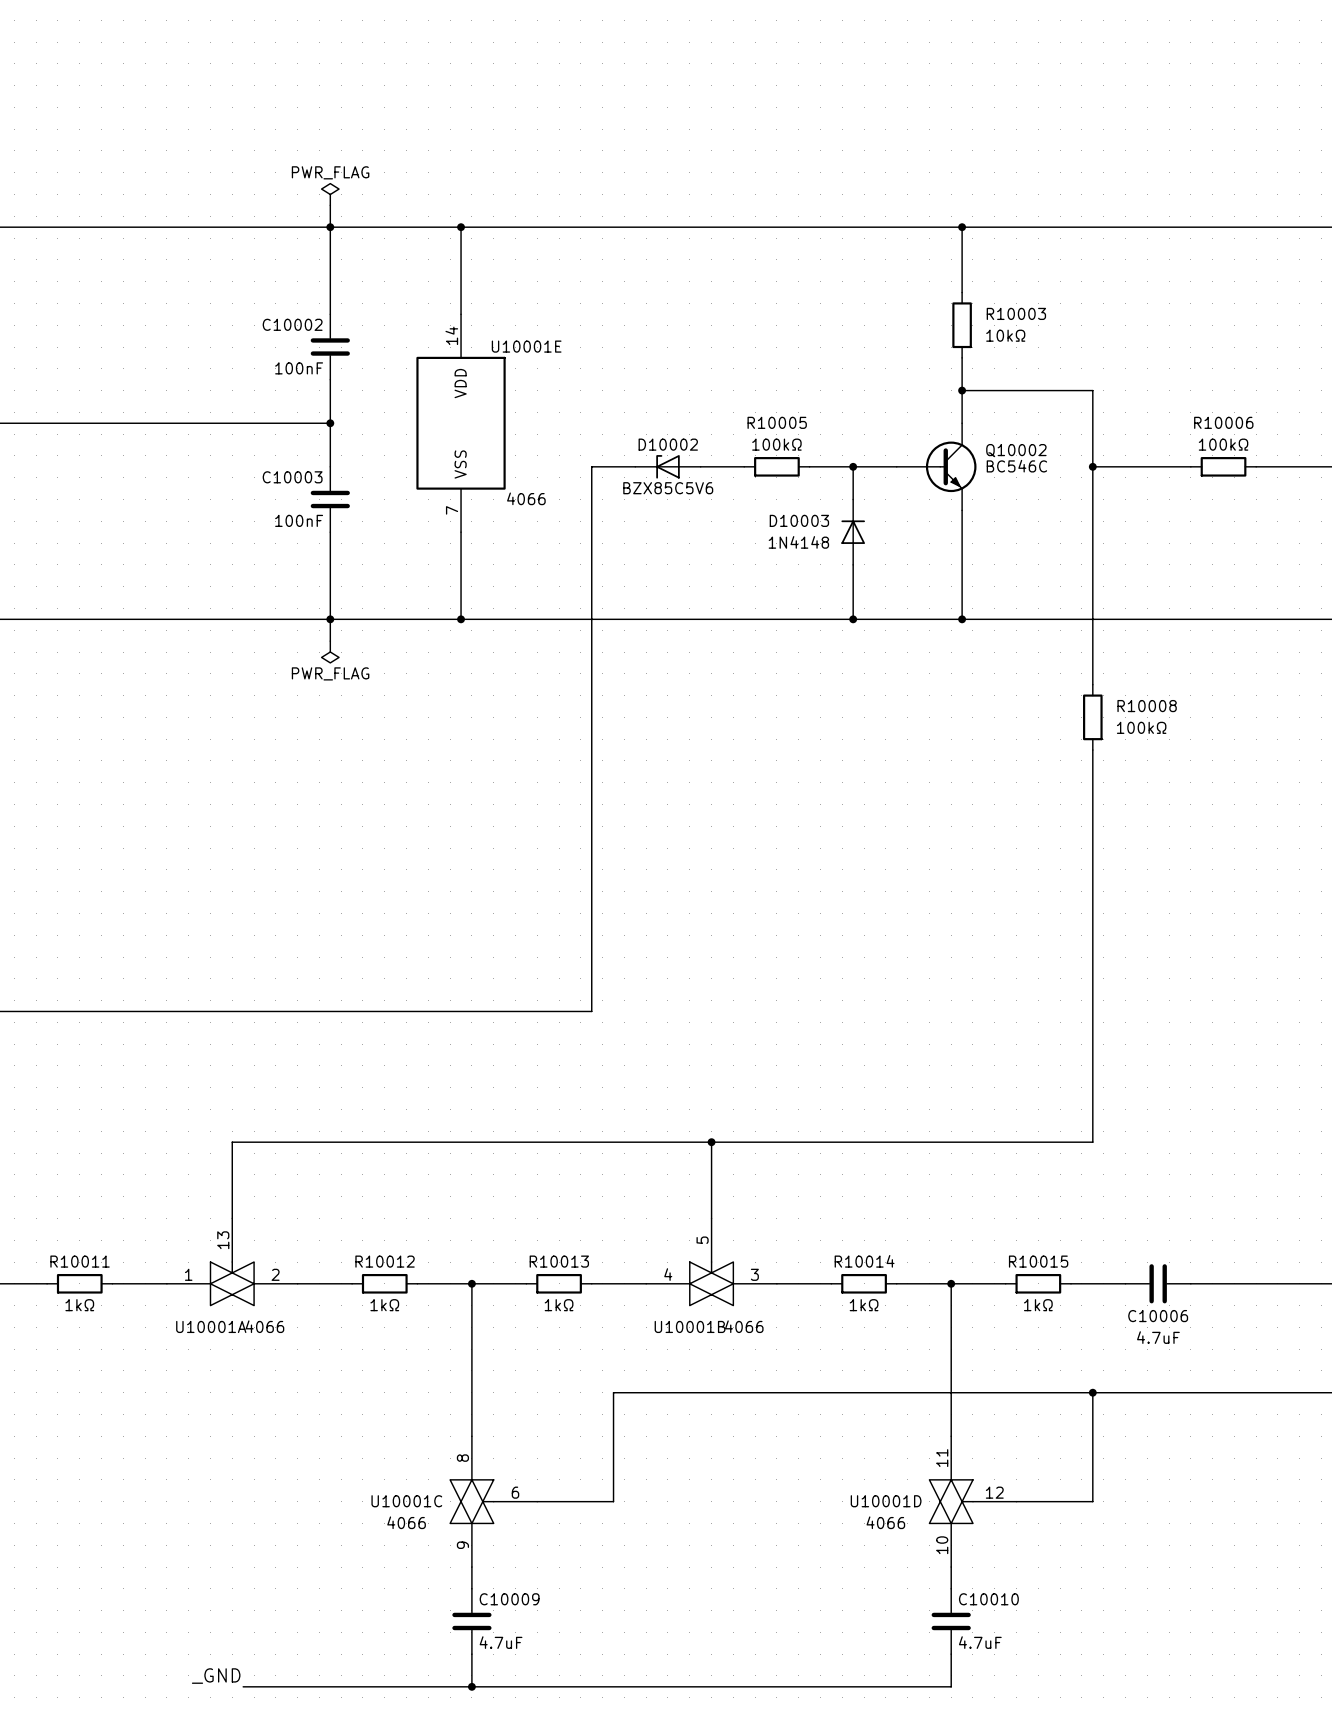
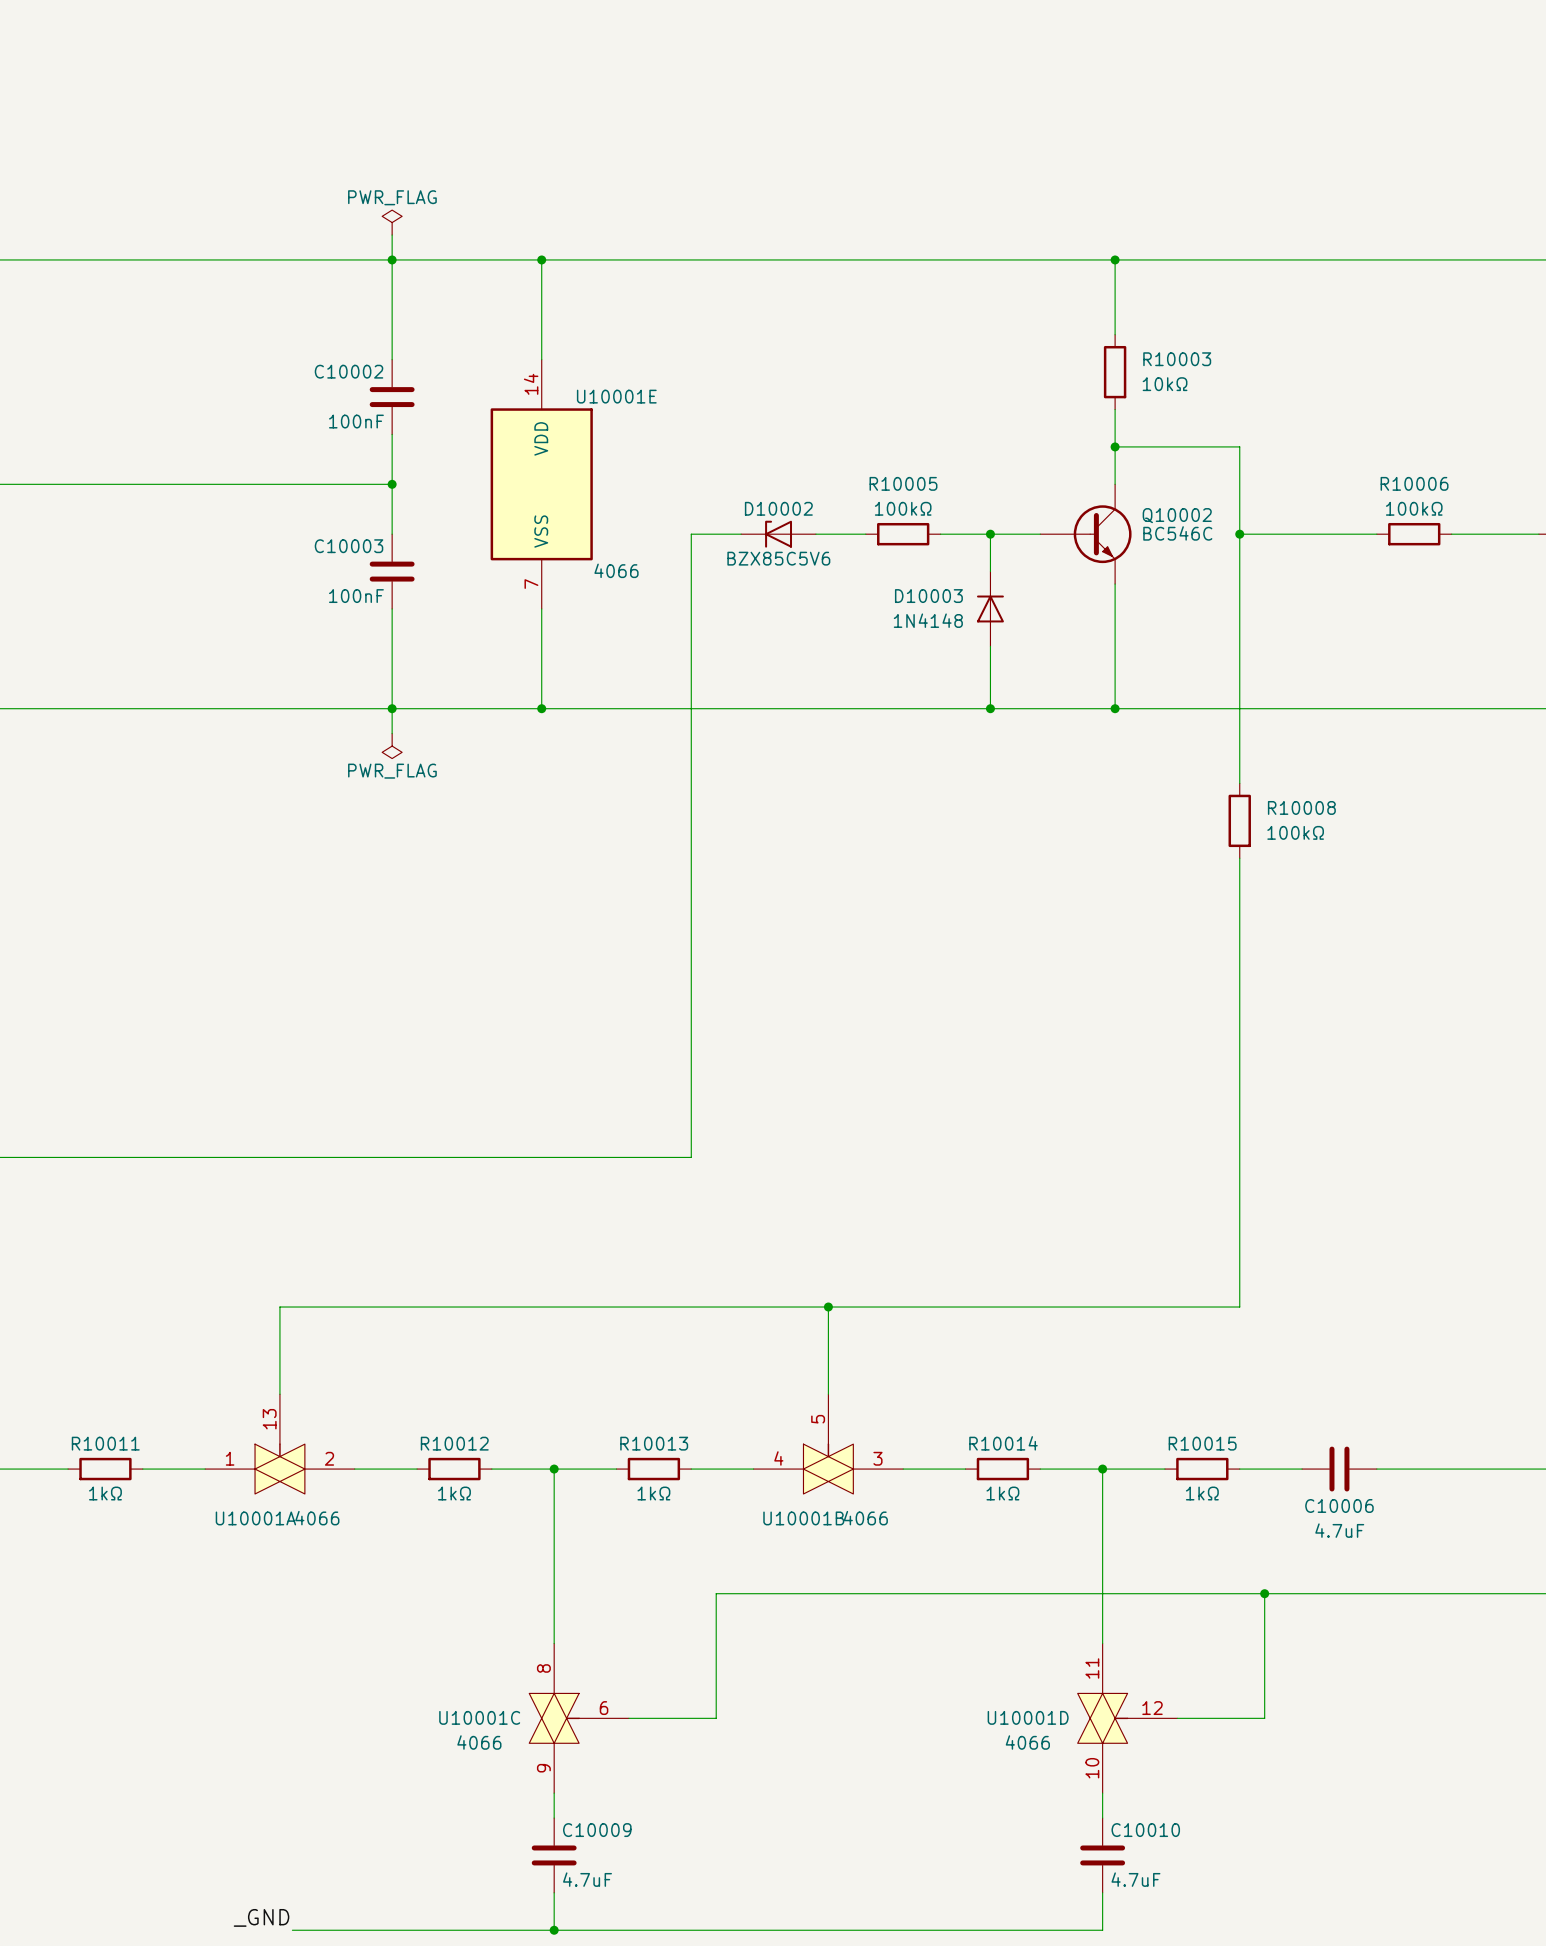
wire: (1071, 390) (1092, 390) (1092, 684) -> (1239, 446) (1239, 783)
wire: none -> (1239, 534) (1264, 534)
junction position: (1092, 466) -> (1239, 534)
R10008 position: (1092, 717) -> (1239, 820)
wire: (1092, 750) (1092, 1142) (1071, 1142) -> (1239, 858) (1239, 1307)

